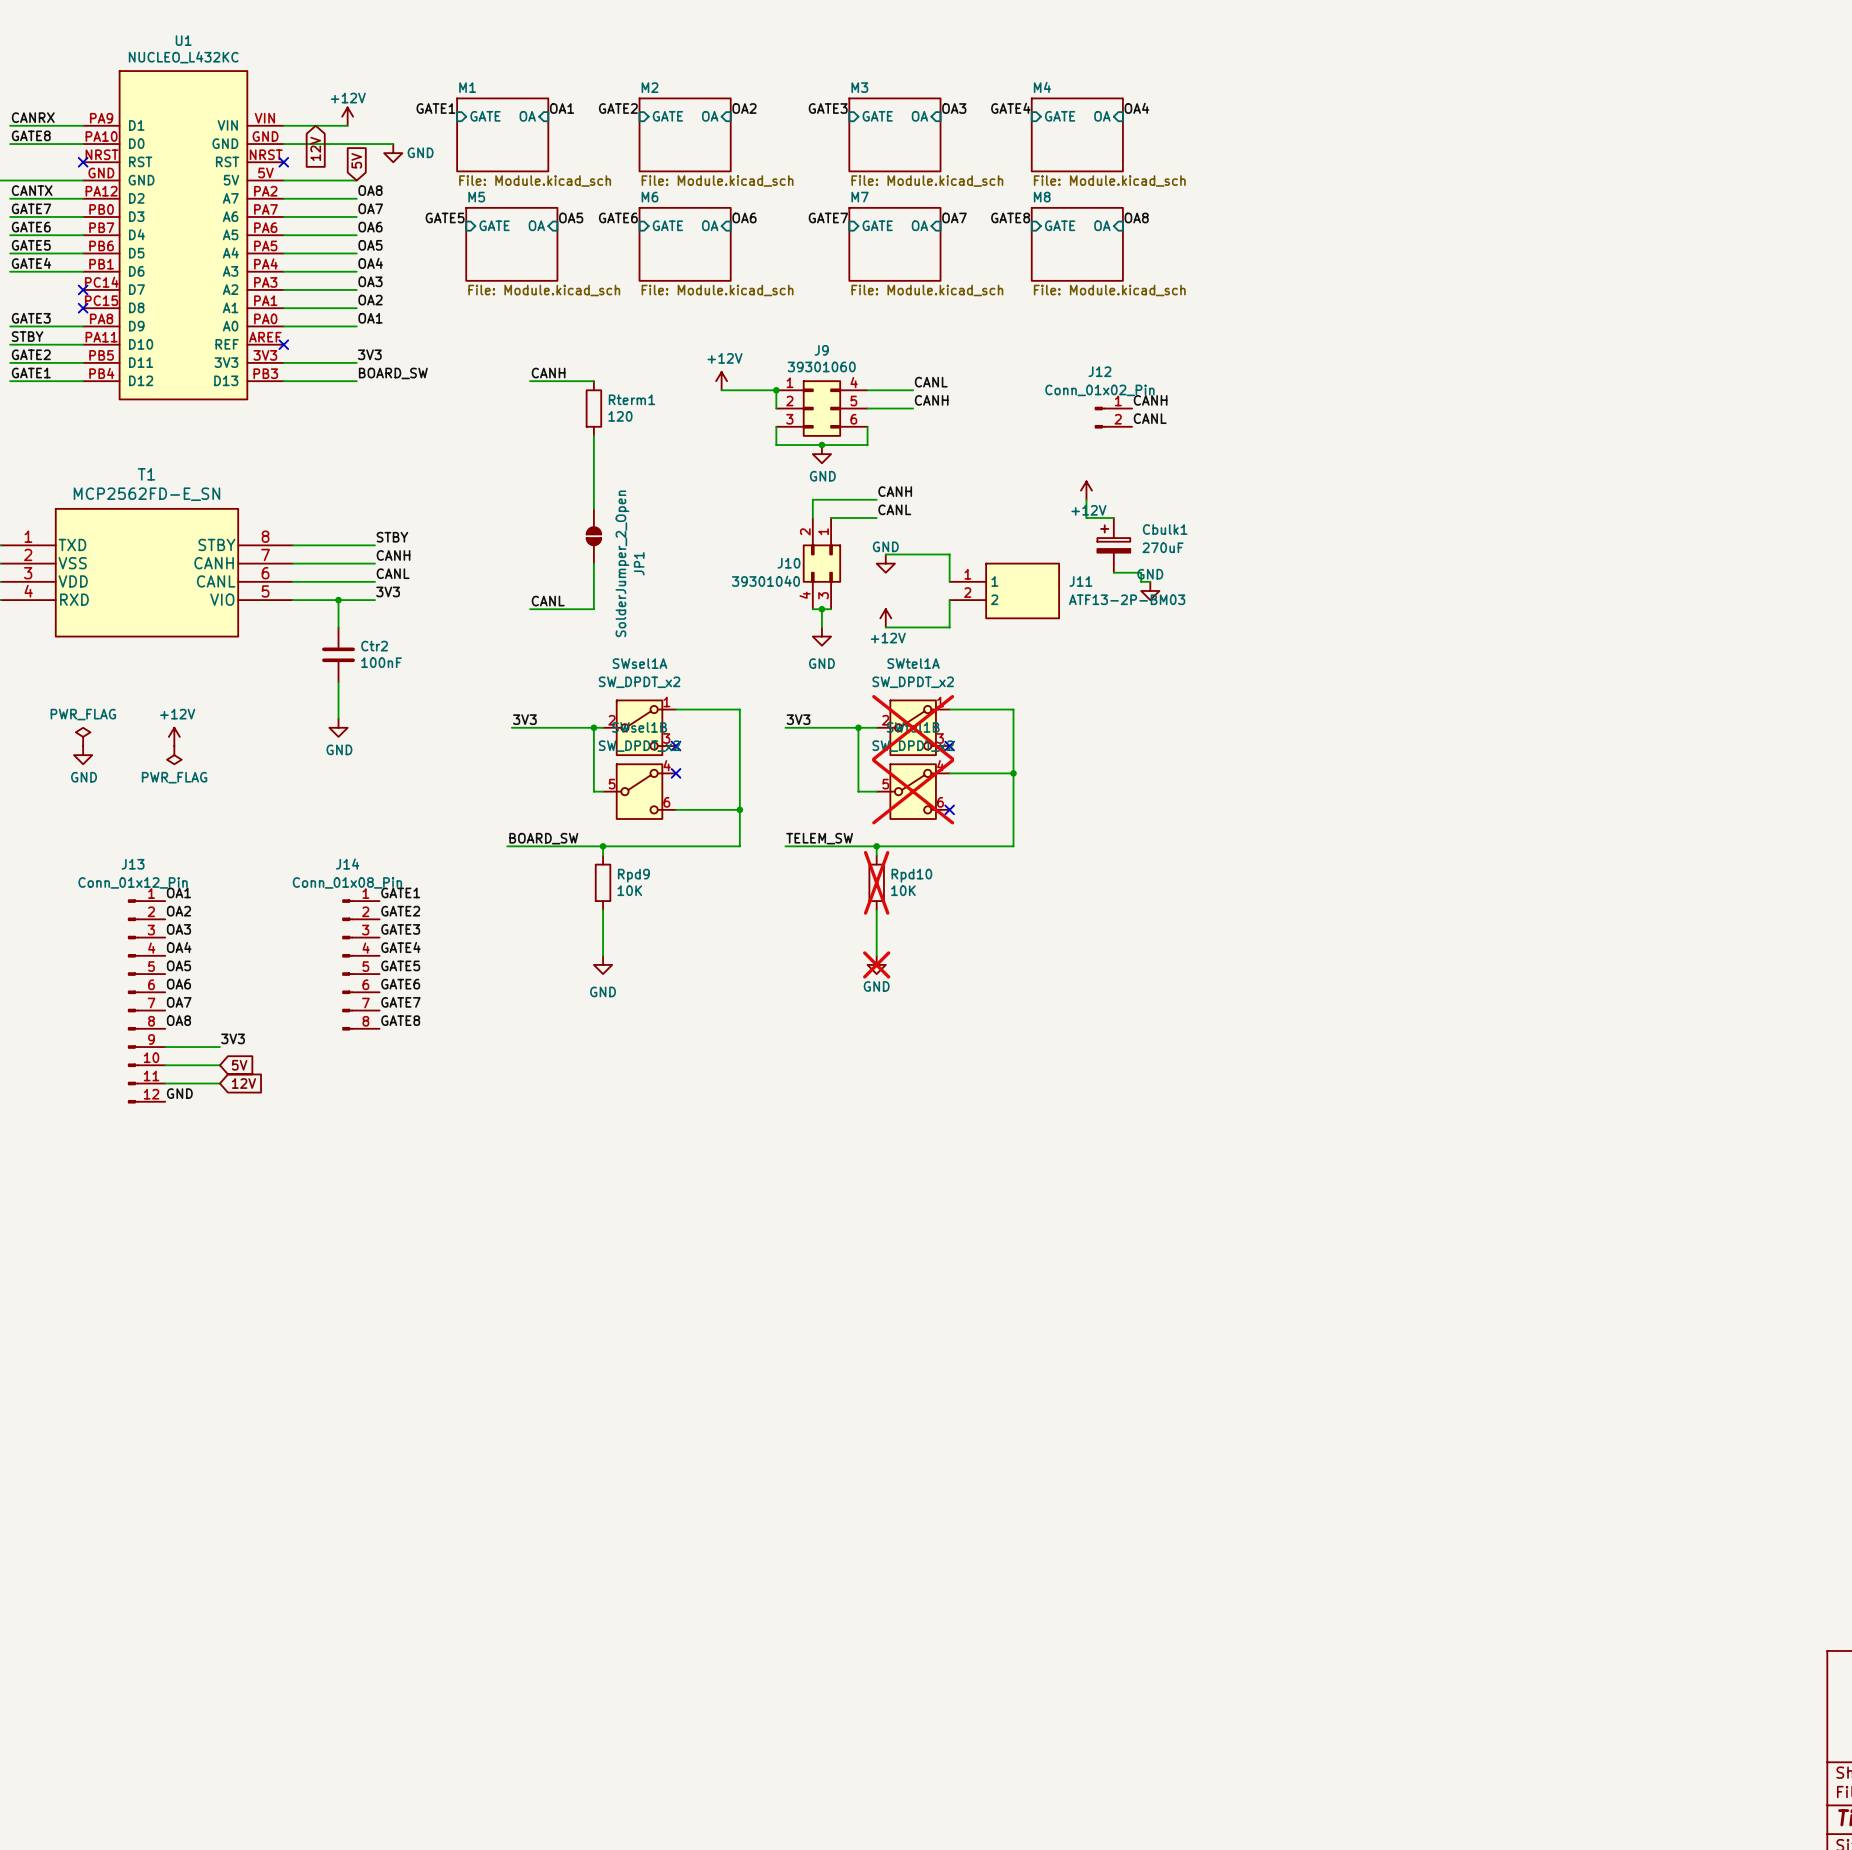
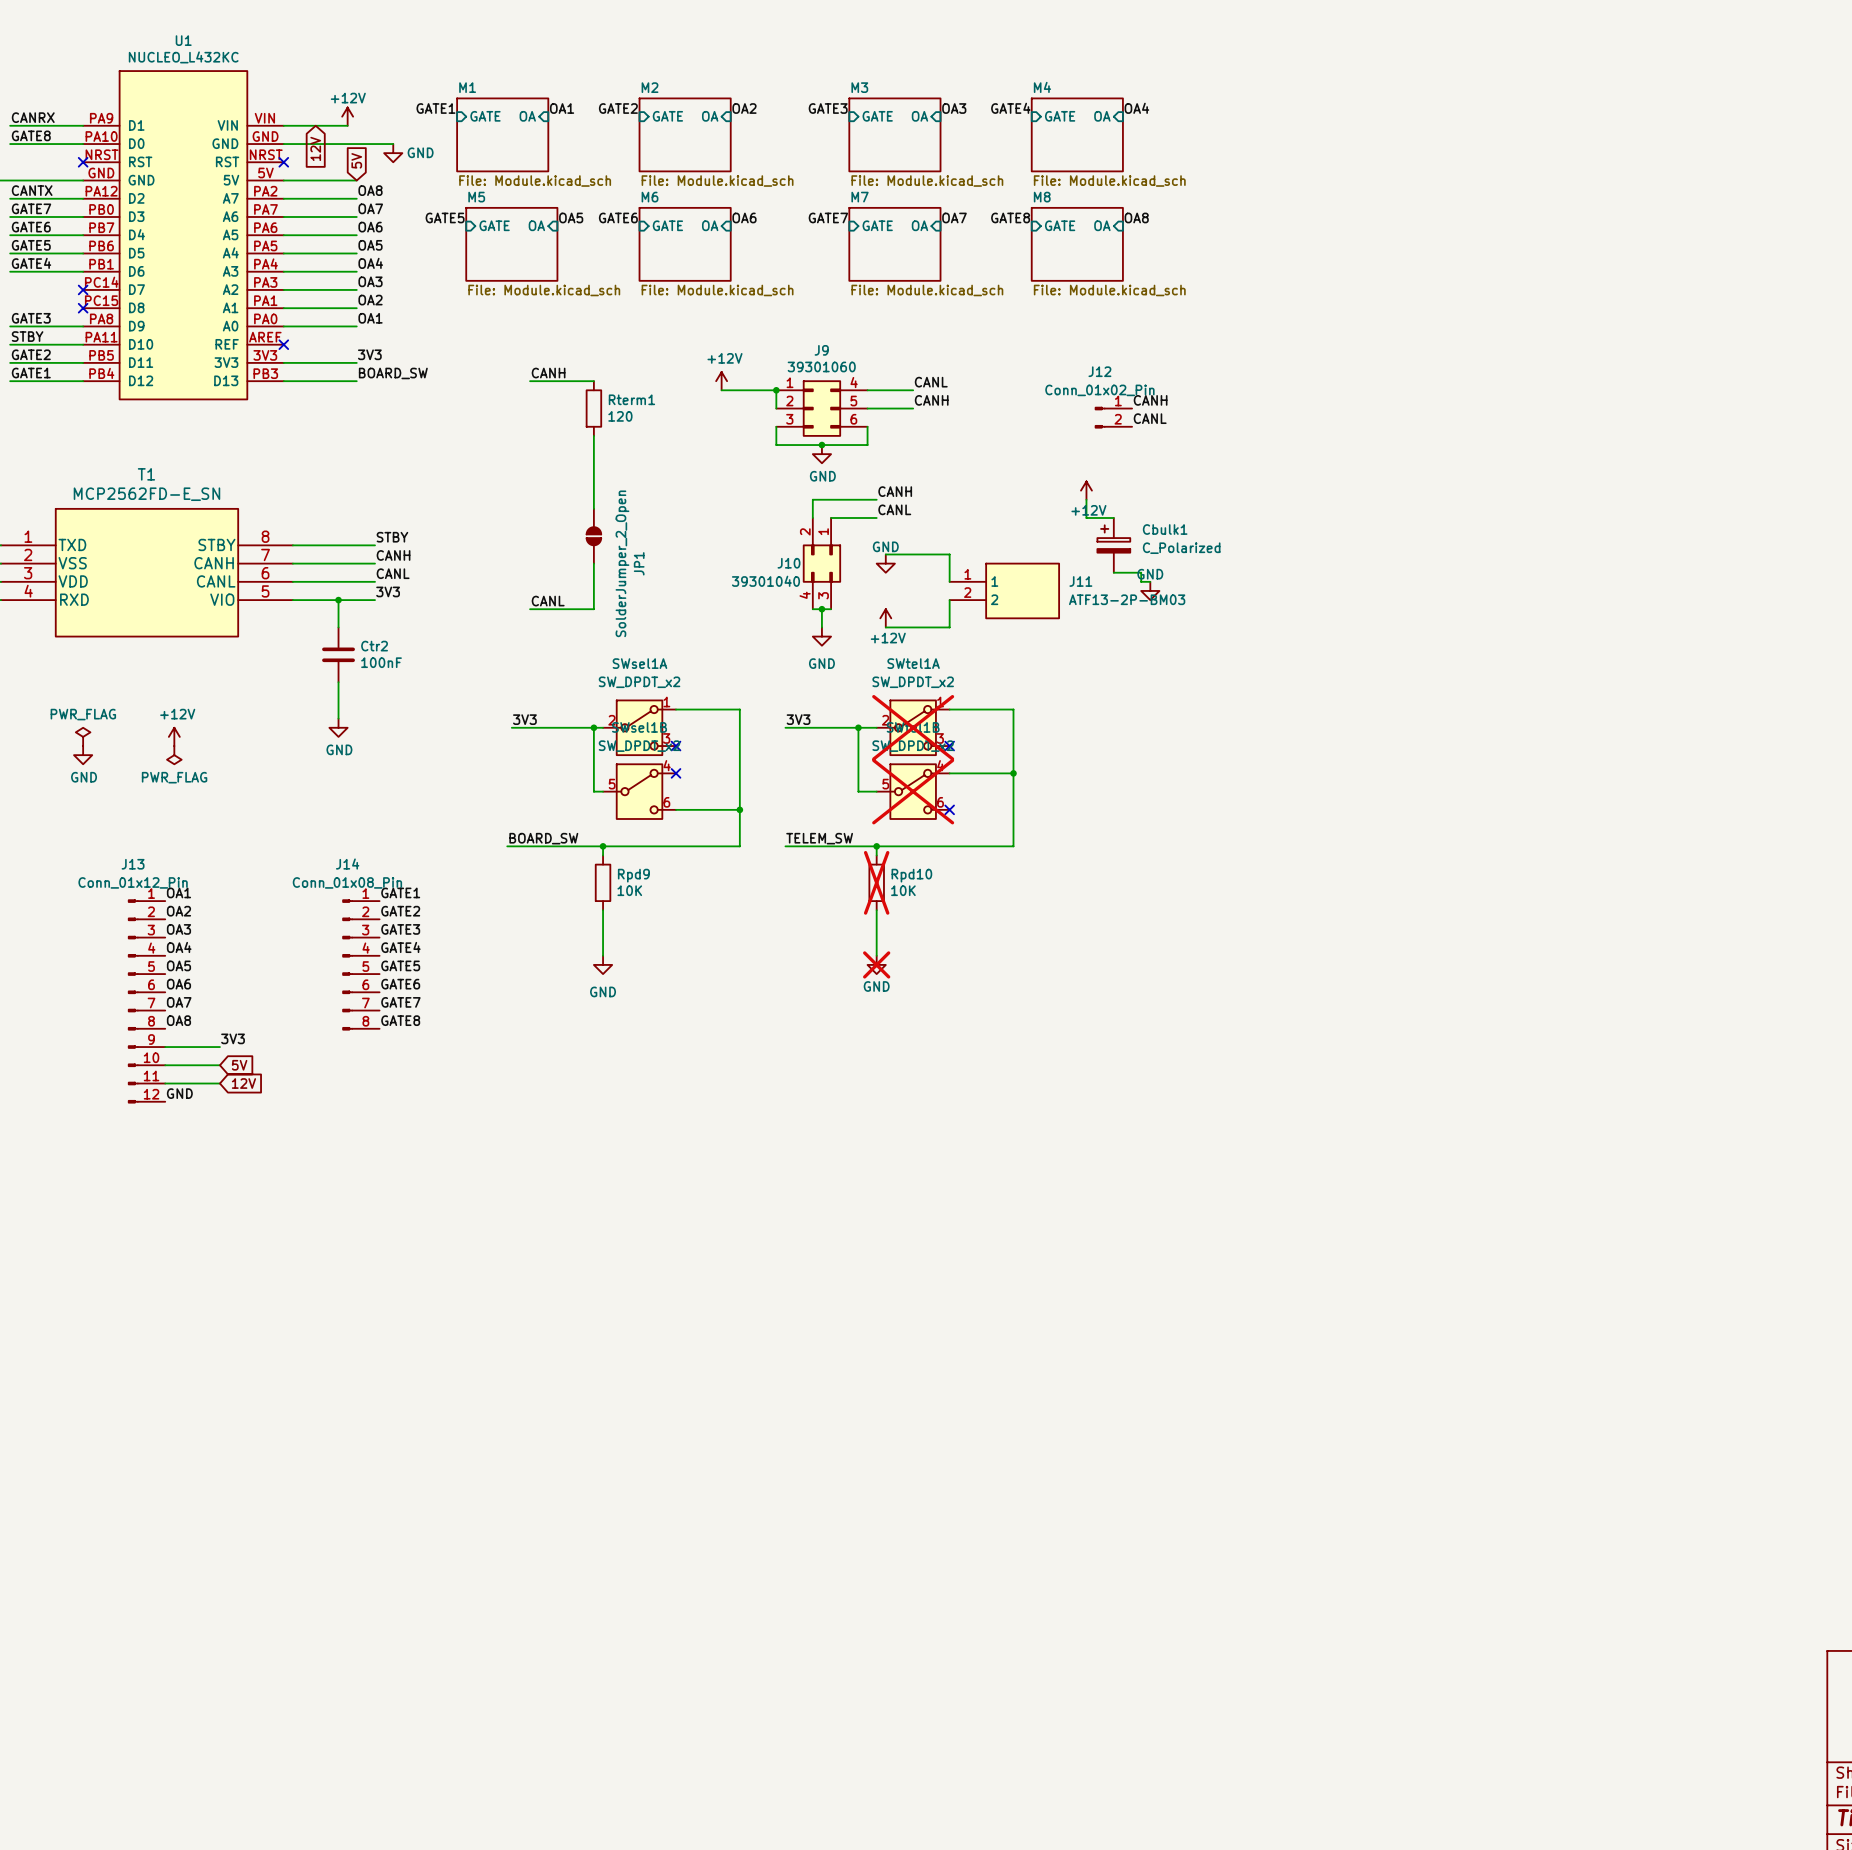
Cbulk1 value: 270uF (1162, 547) -> C_Polarized (1181, 548)

